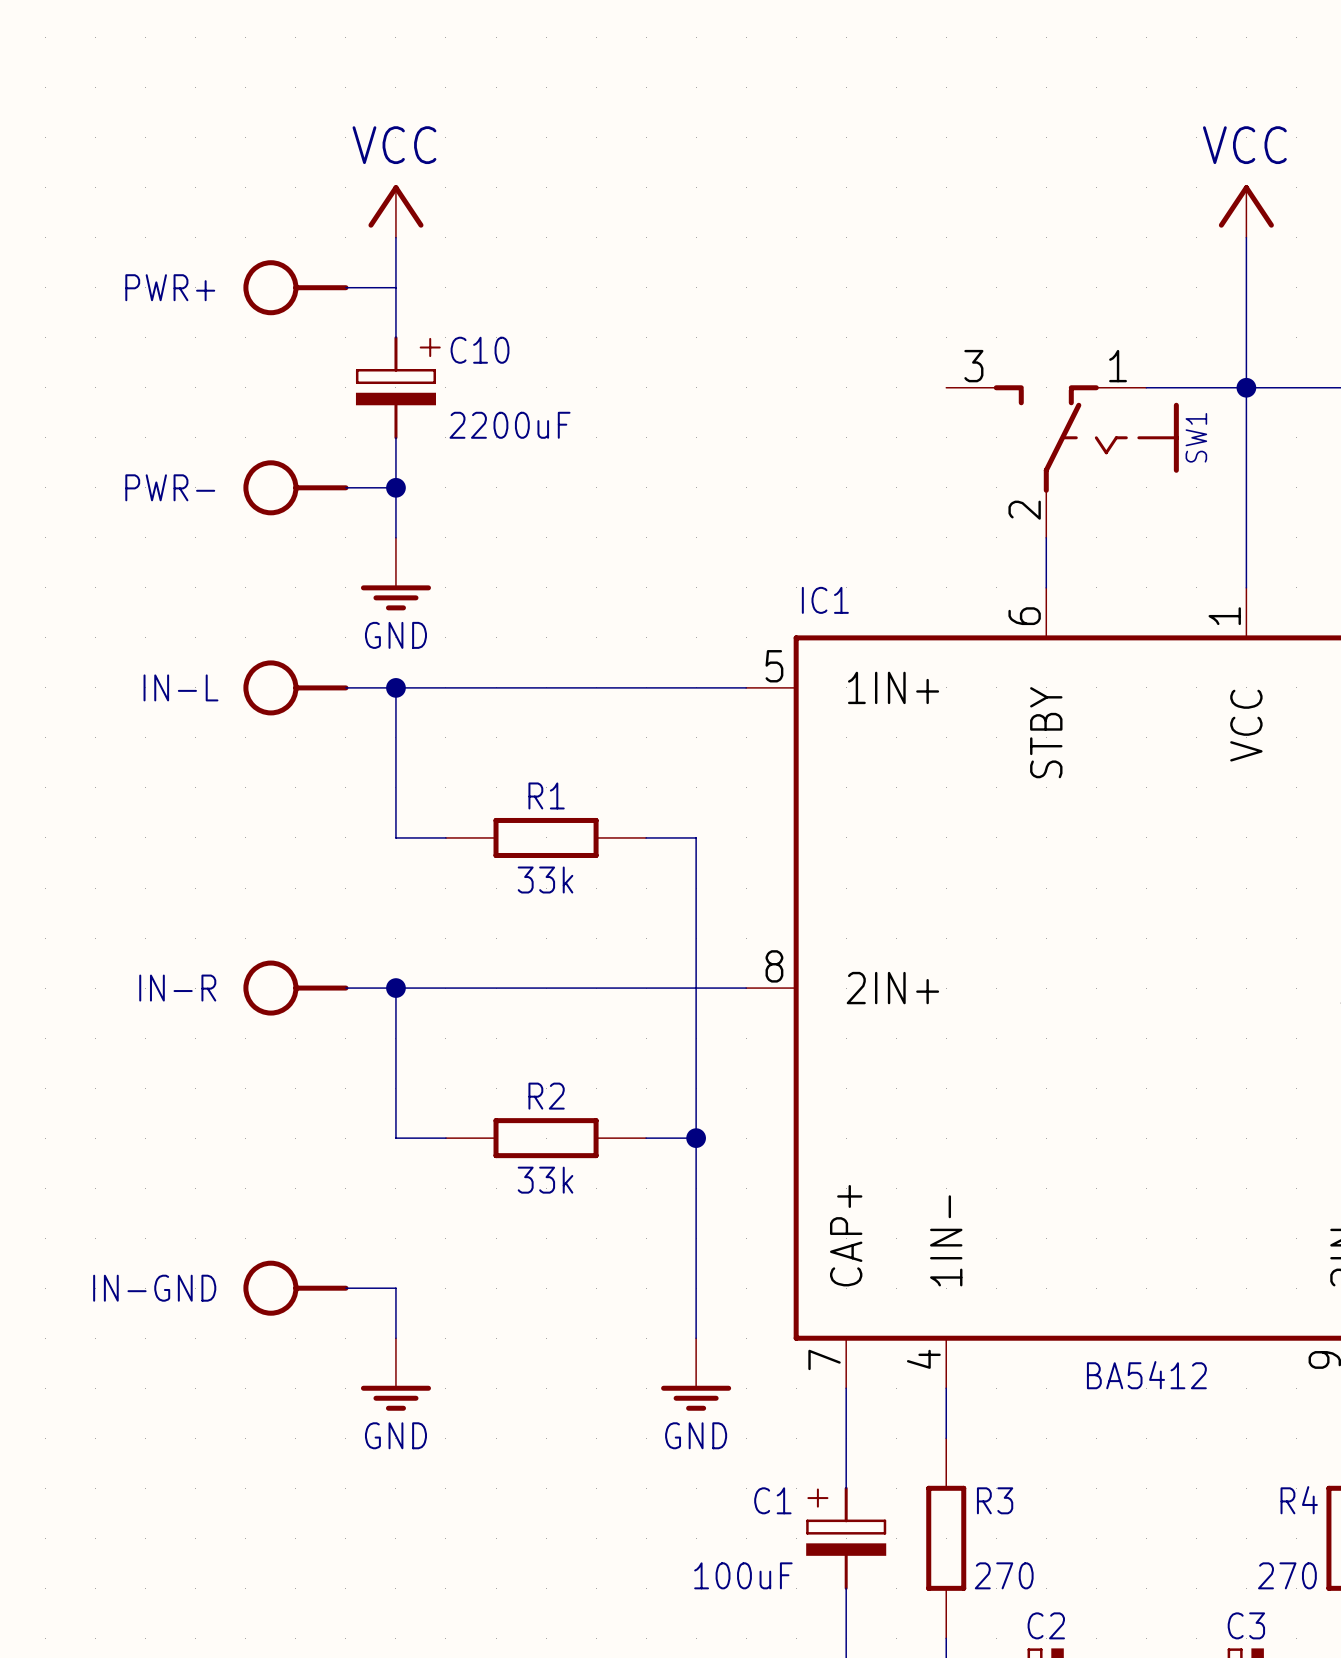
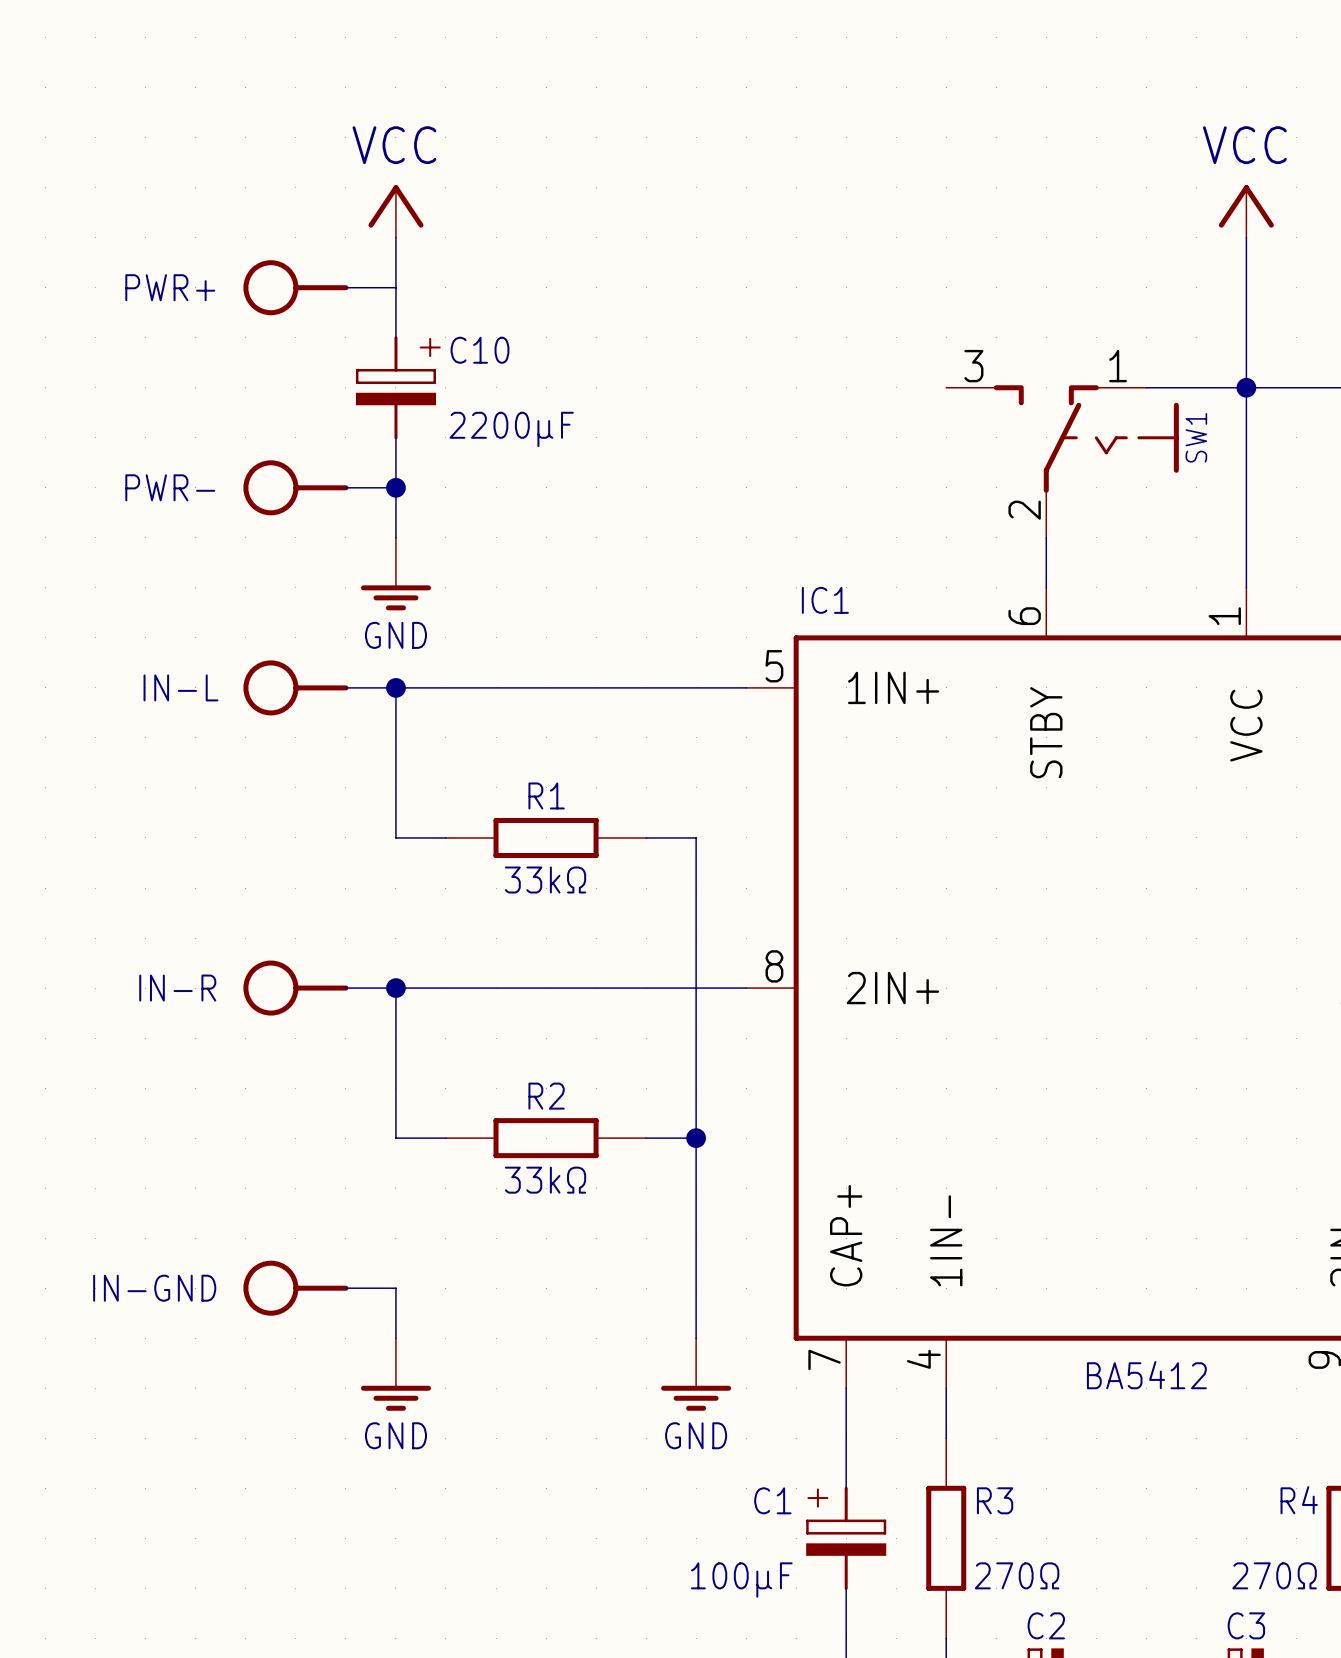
C10 value: 2200uF (510, 425) -> 2200μF (511, 429)
R1 value: 33k (545, 880) -> 33kΩ (545, 880)
R2 value: 33k (545, 1180) -> 33kΩ (545, 1180)
C1 value: 100uF (743, 1575) -> 100μF (741, 1580)
R3 value: 270 (1004, 1575) -> 270Ω (1017, 1575)
R4 value: 270 (1287, 1575) -> 270Ω (1274, 1575)

